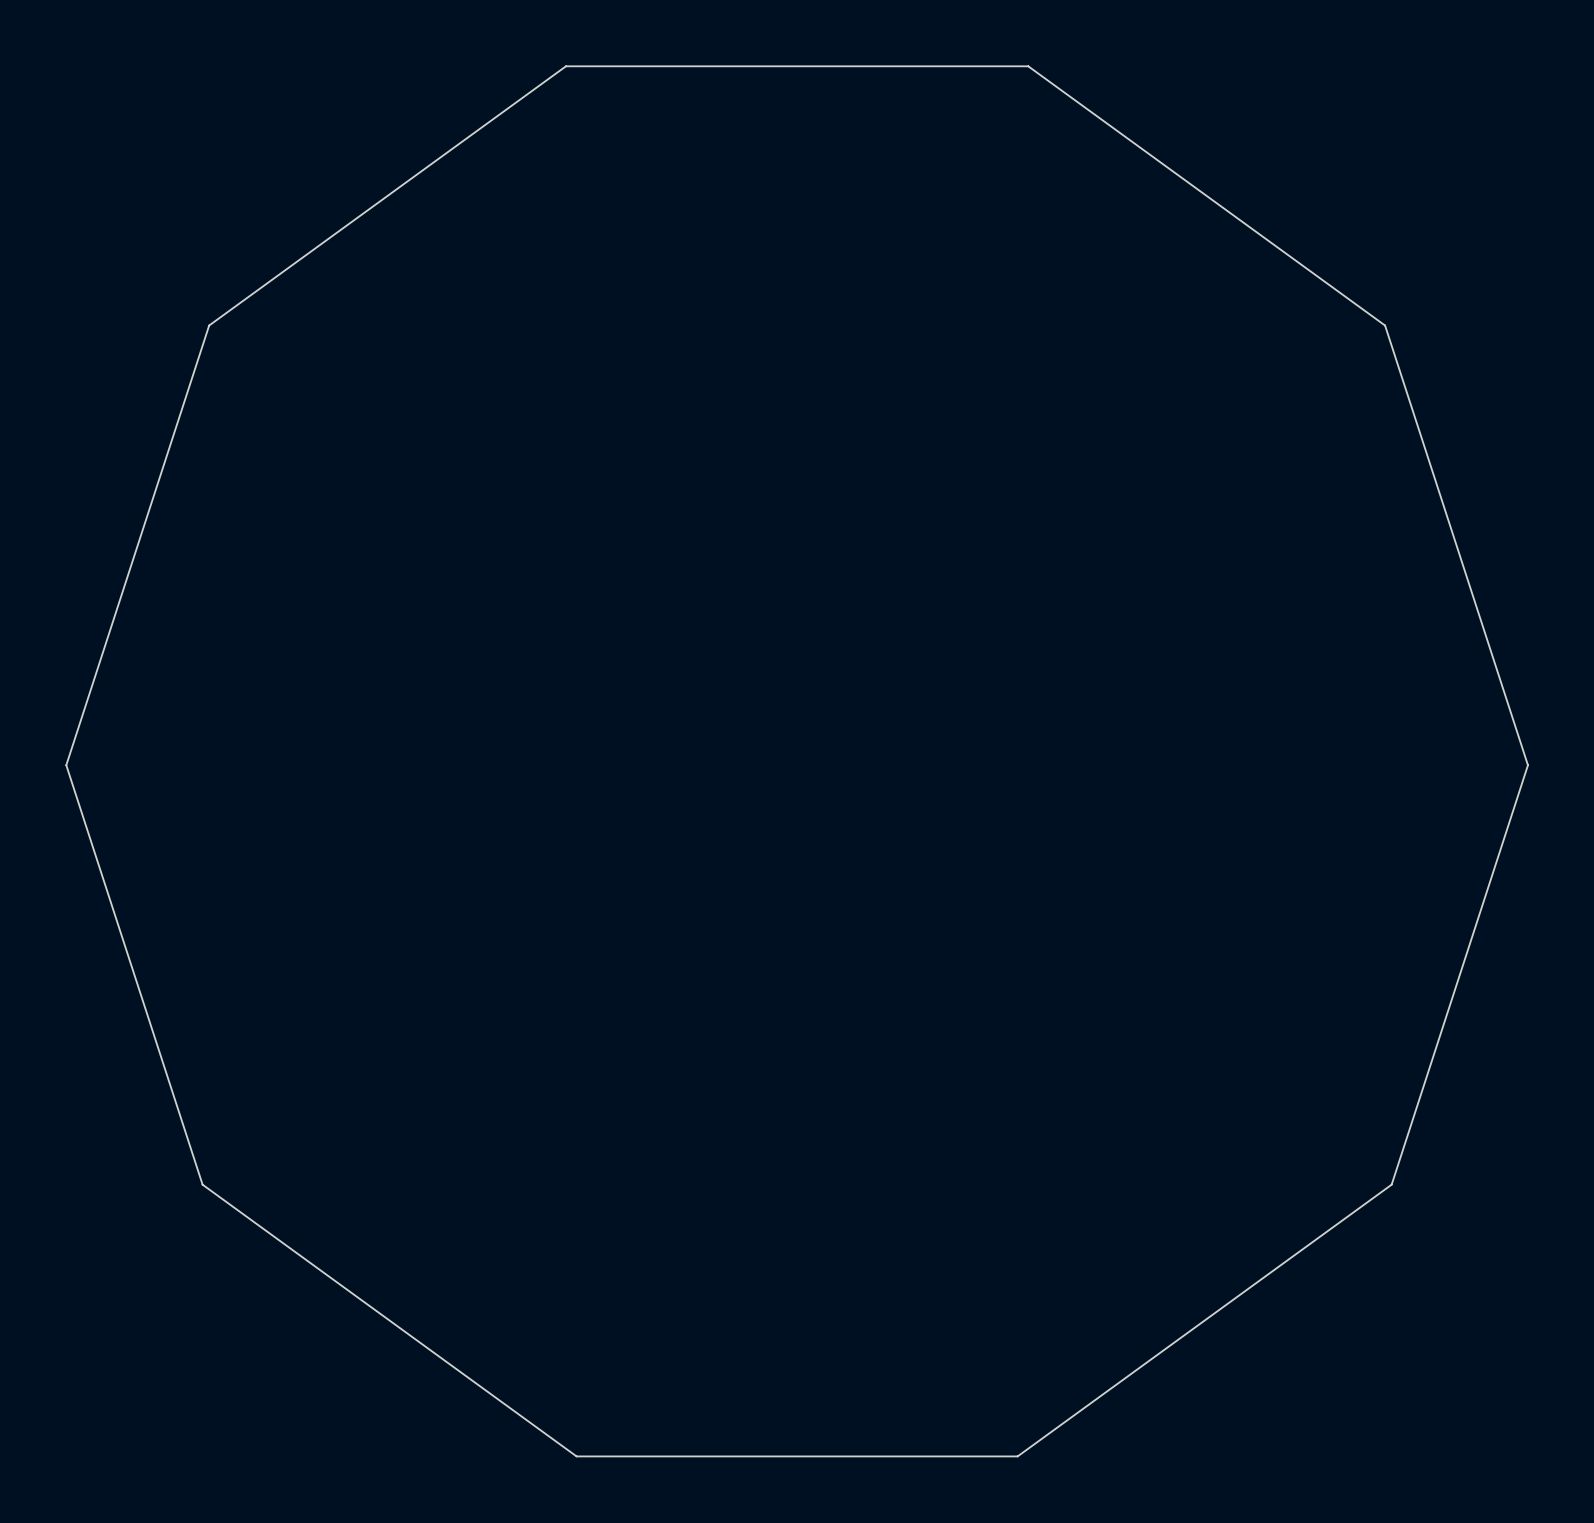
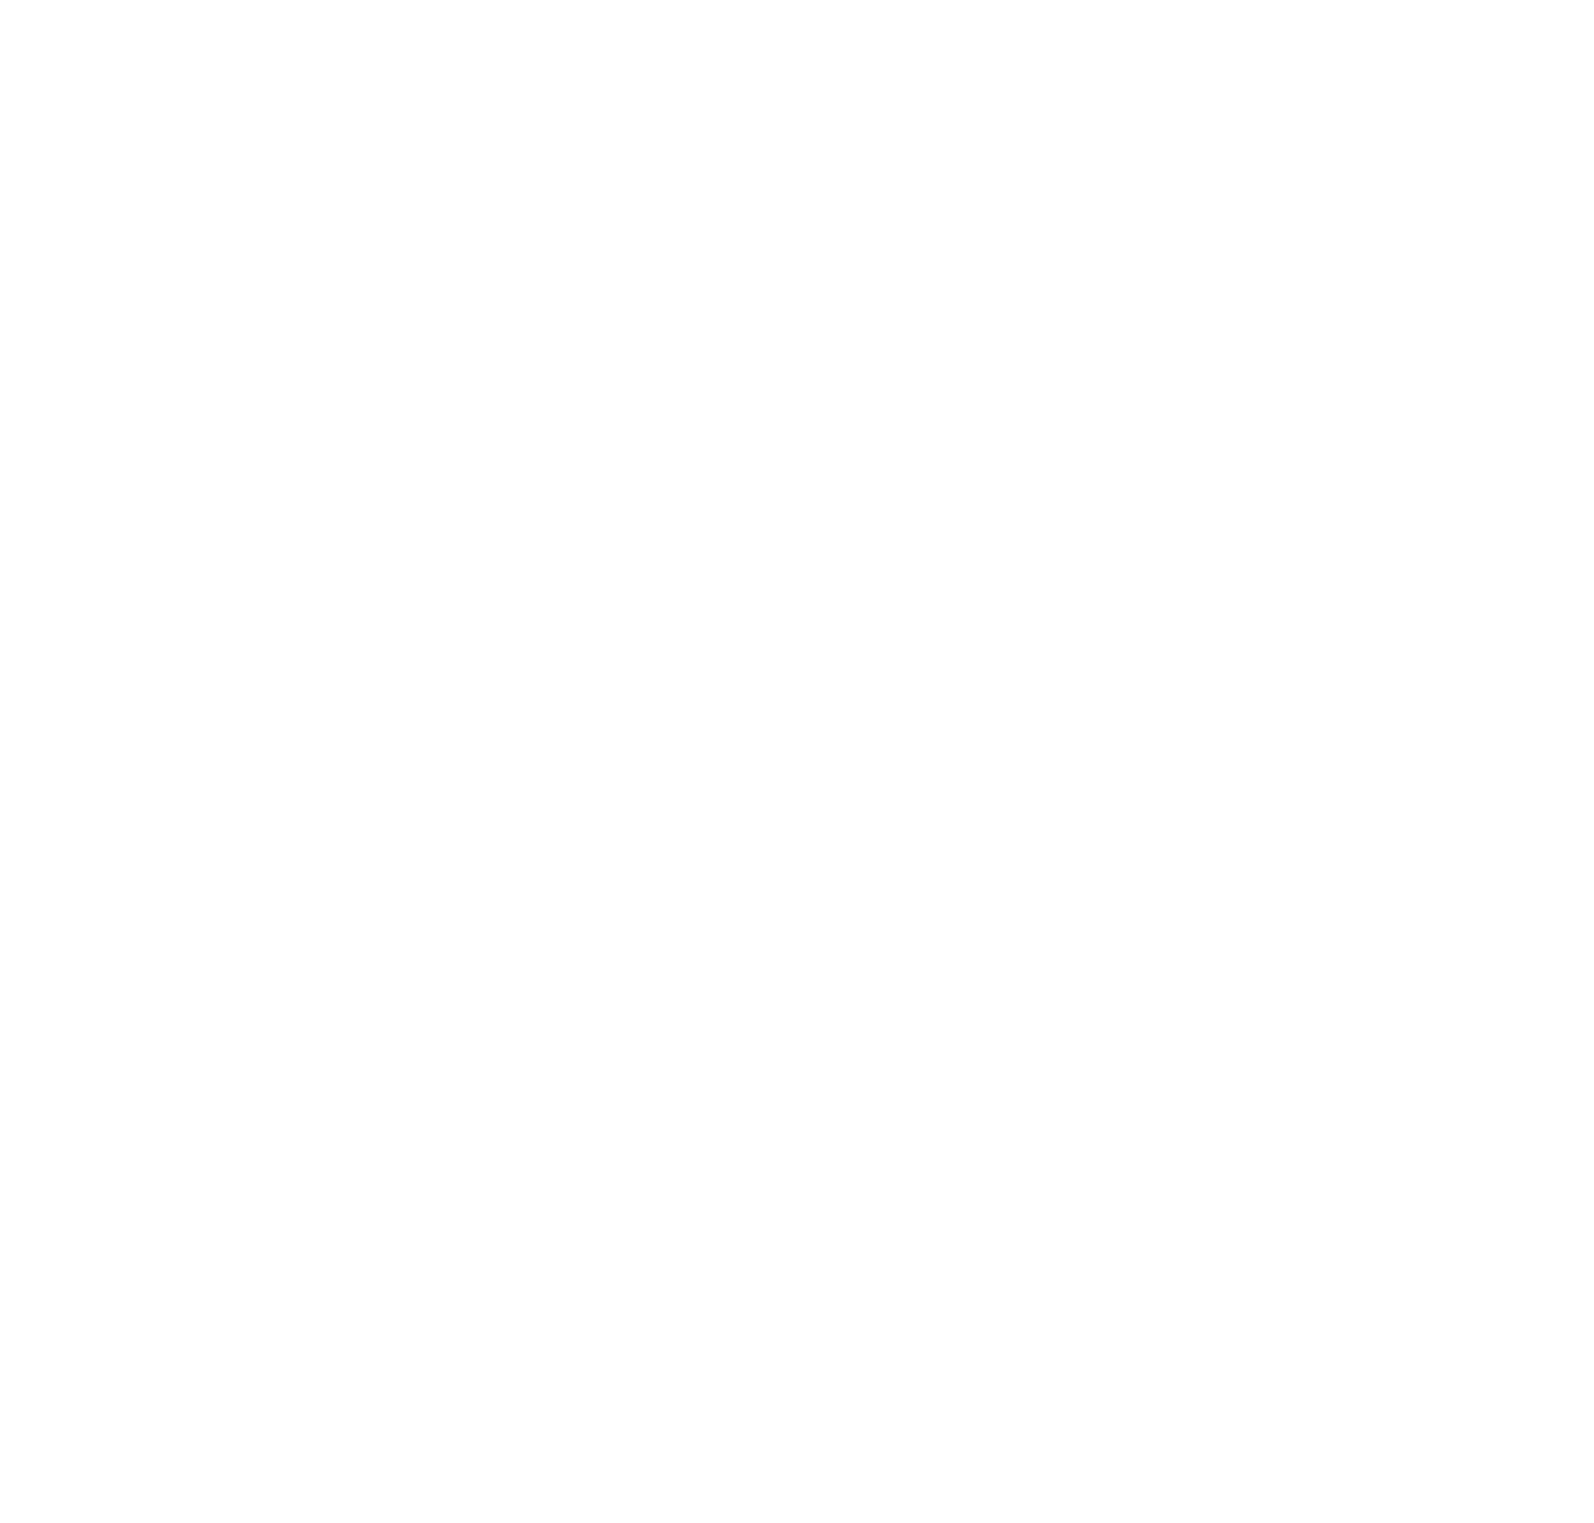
board edge: (565, 66) (1028, 66) (1385, 325) (1527, 765) (1391, 1184) (1017, 1456) (576, 1456) (202, 1184) (66, 765) (209, 325) (565, 66) -> none

